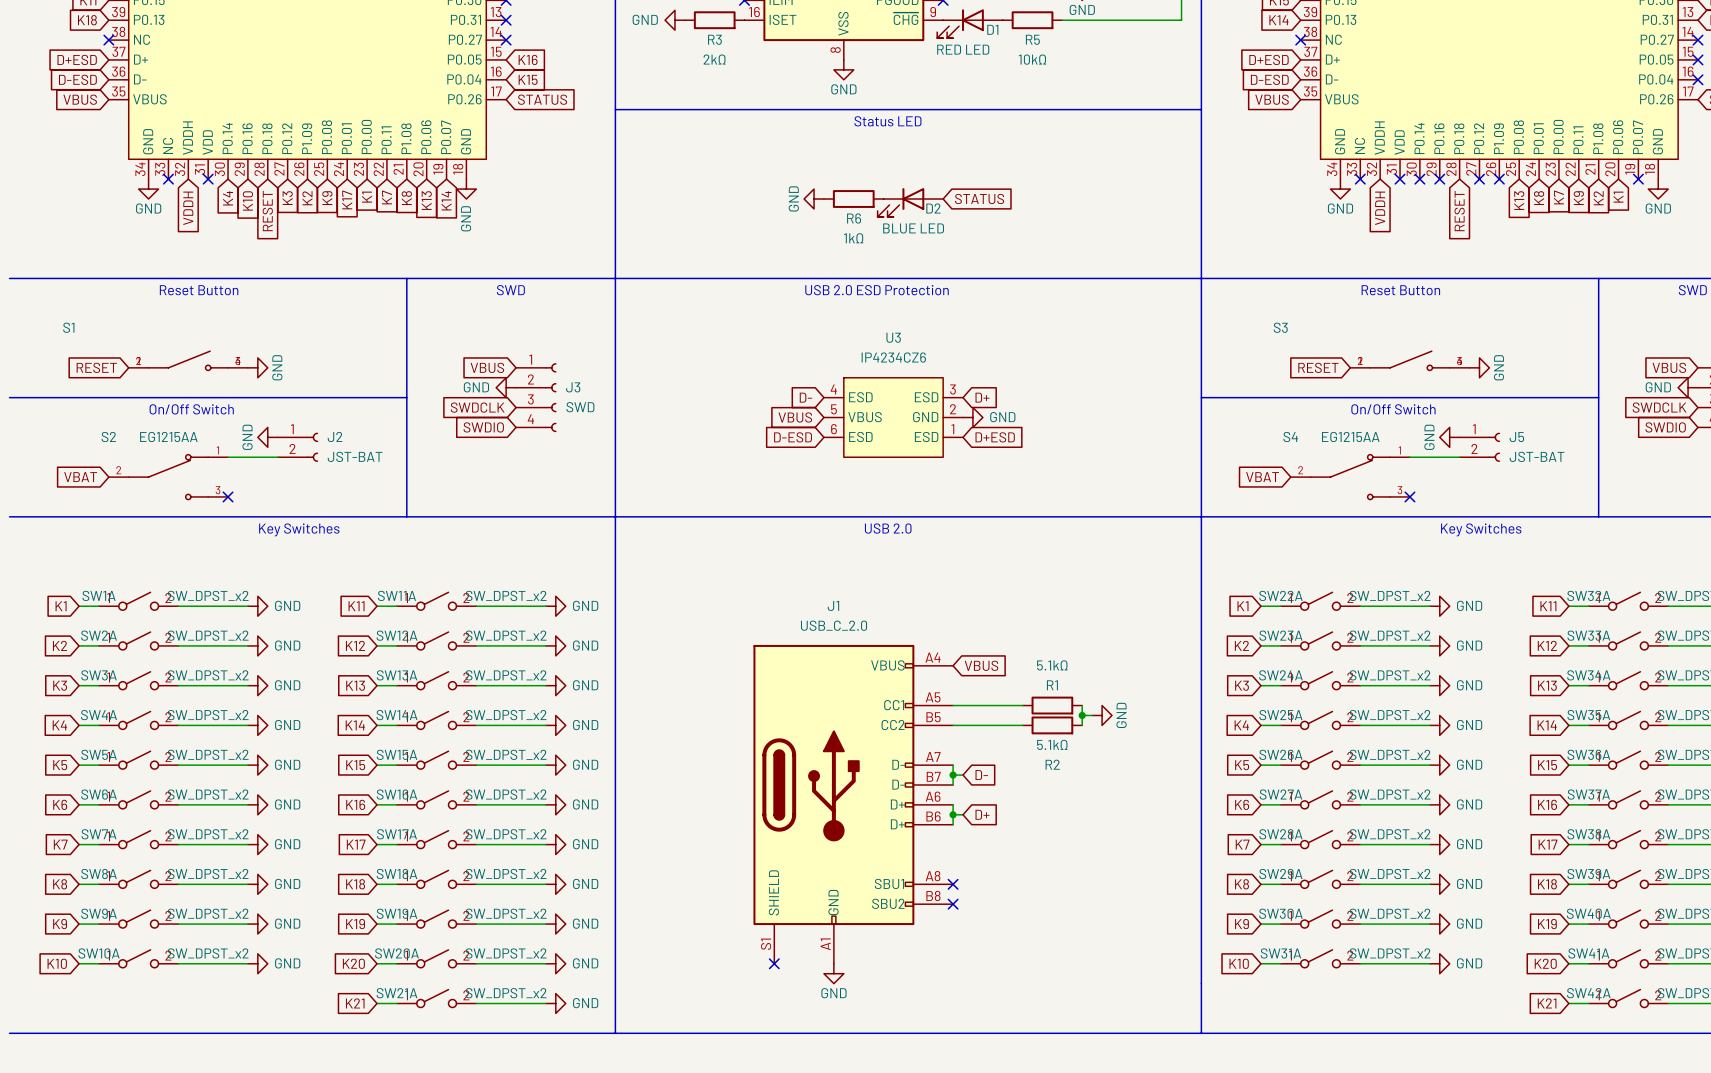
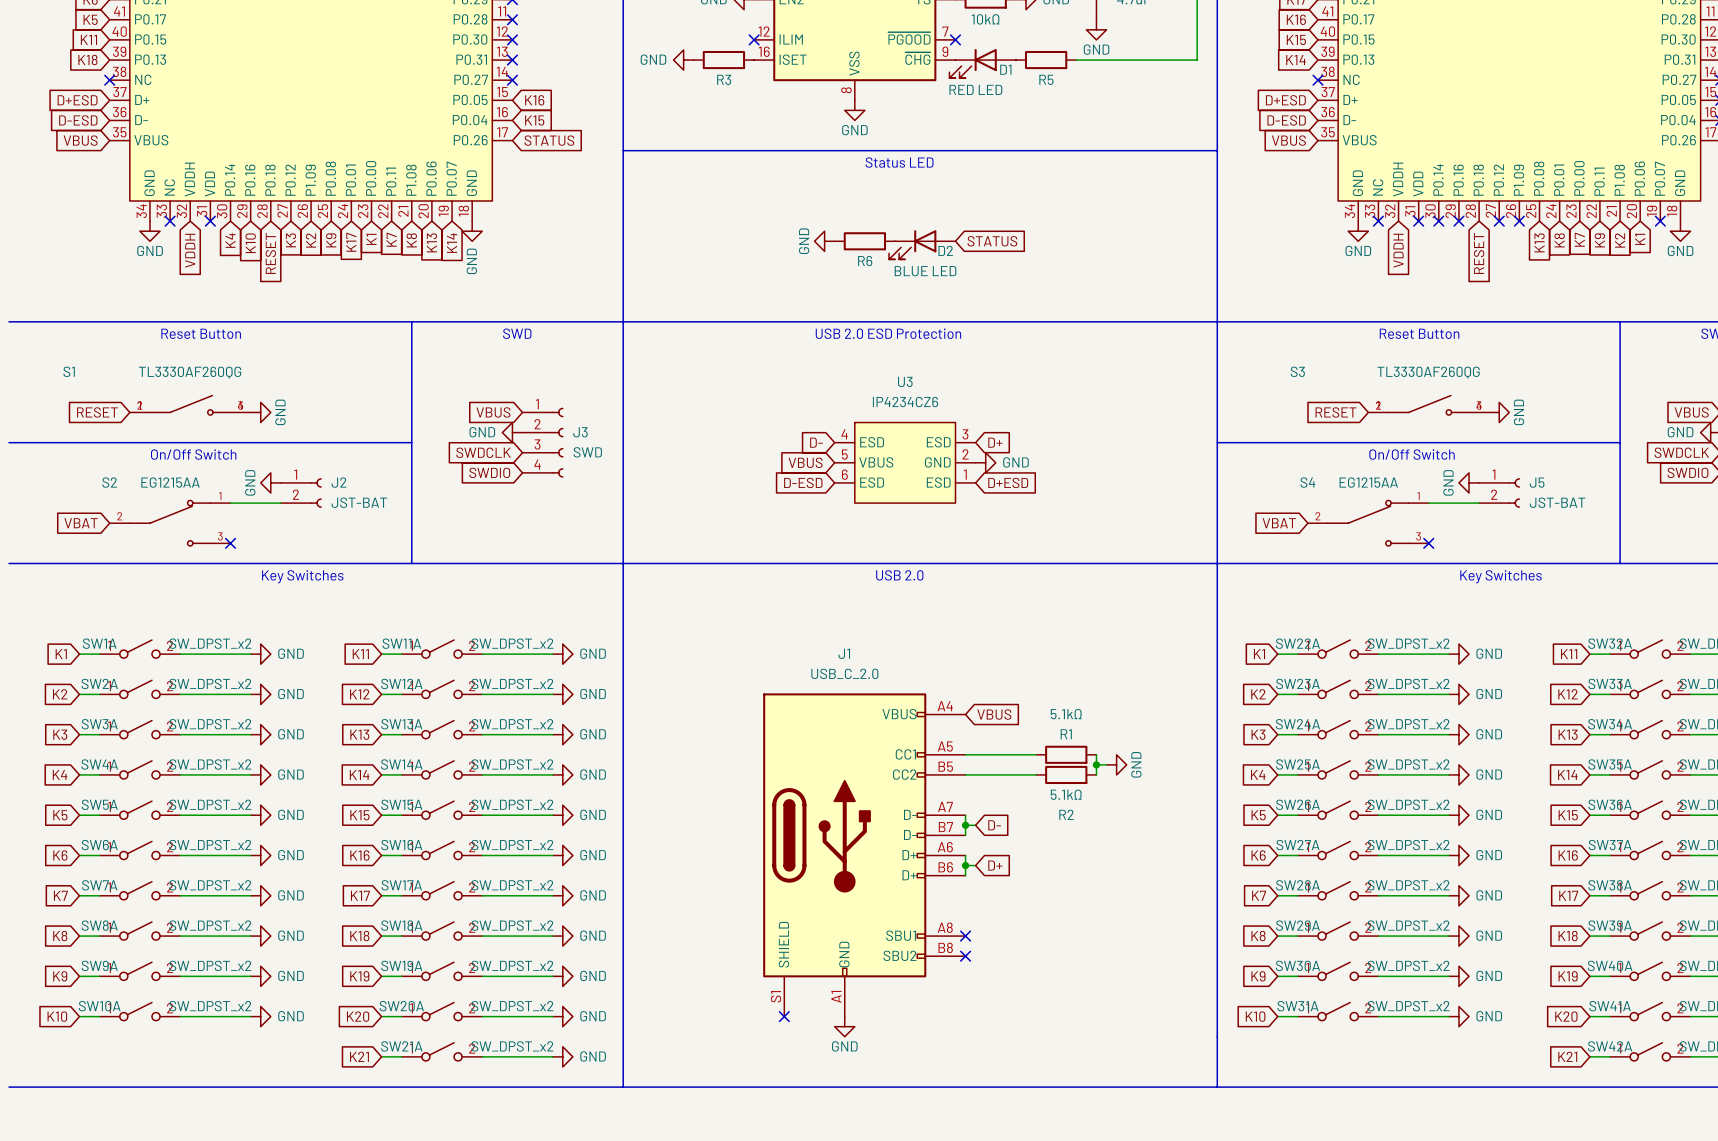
R3 value: 2kΩ (714, 59) -> none
R5 value: 10kΩ (1032, 59) -> none
R6 value: 1kΩ (853, 238) -> none
S1 value: none -> TL3330AF260QG (190, 372)
S3 value: none -> TL3330AF260QG (1428, 372)

